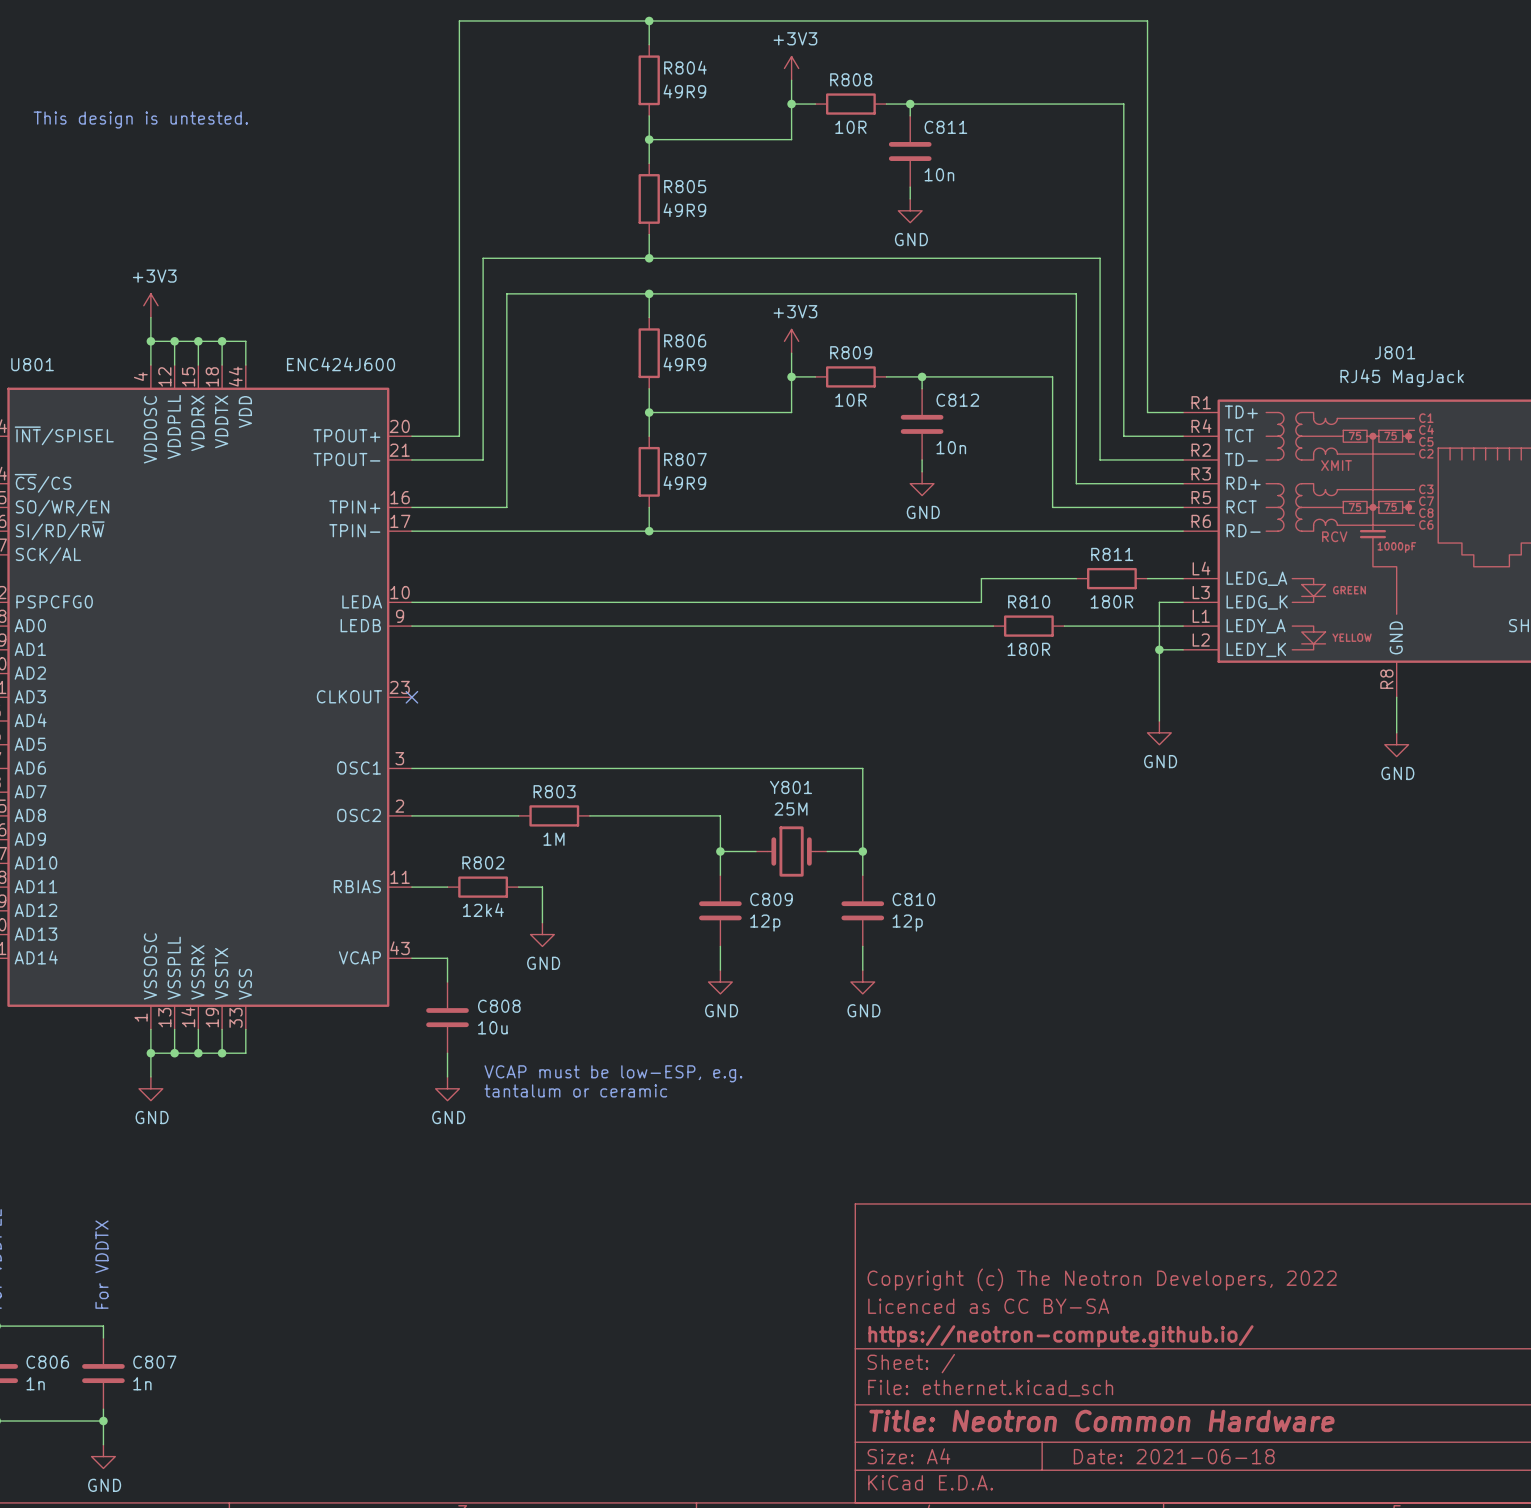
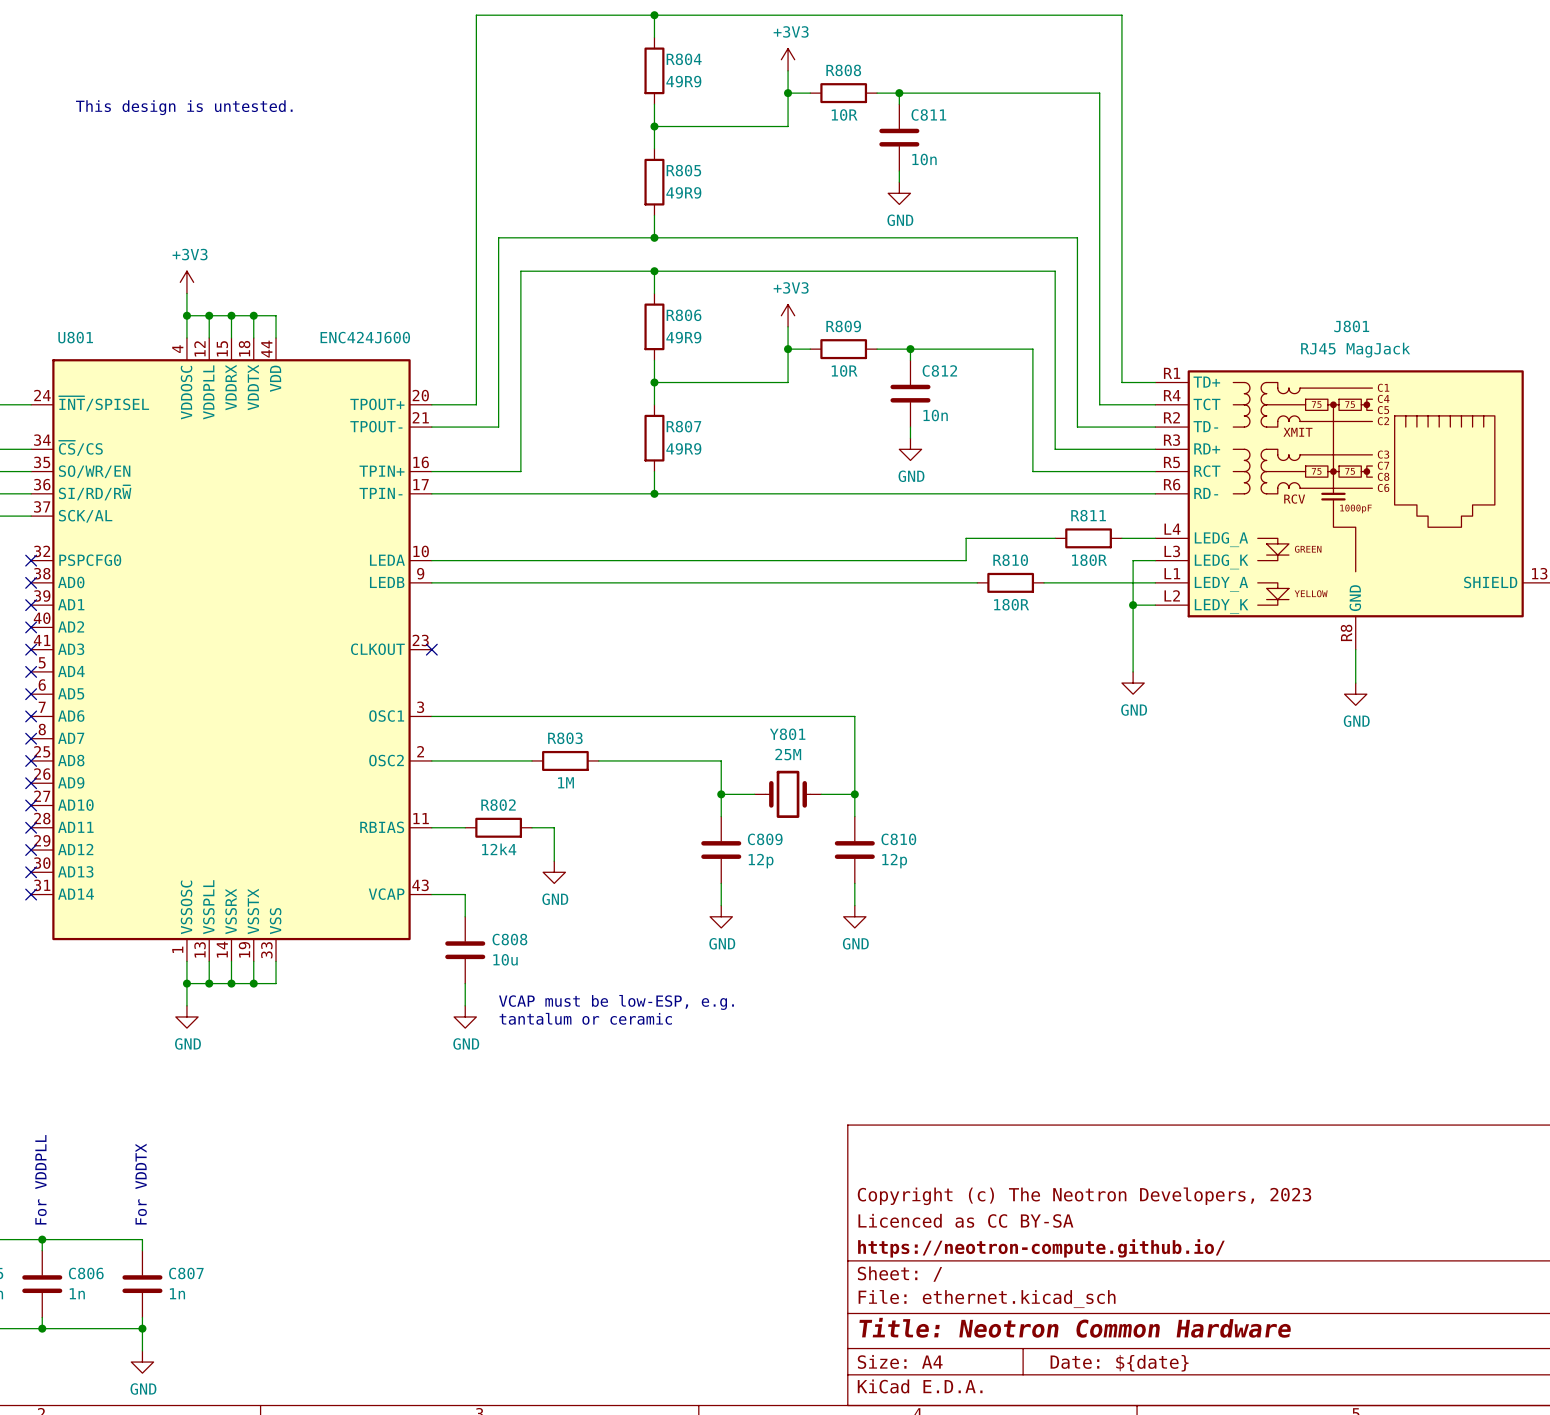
title block: Copyright (c) The Neotron Developers, 2022 (1102, 1279) -> Copyright (c) The Neotron Developers, 2023 (1084, 1196)
title block: Date: 2021-06-18 (1174, 1456) -> Date: ${date} (1119, 1363)

